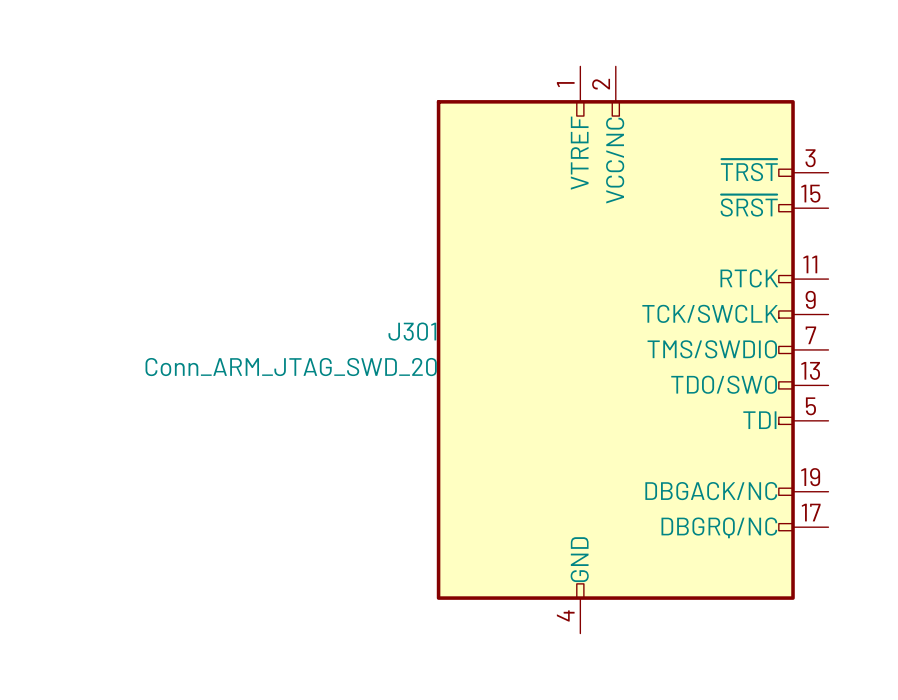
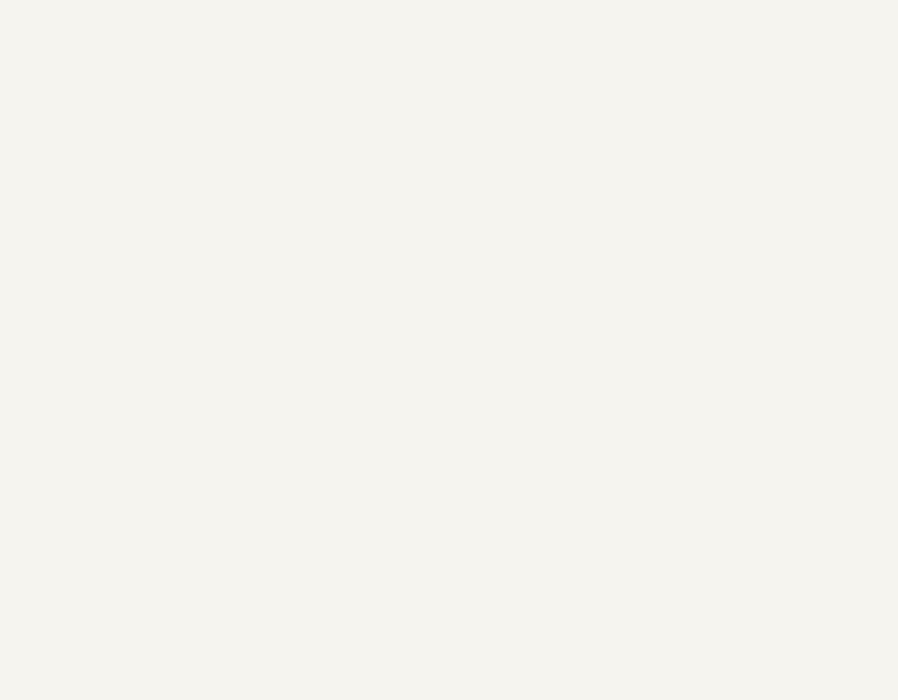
J301: Conn_ARM_JTAG_SWD_20 (632, 349) -> none

